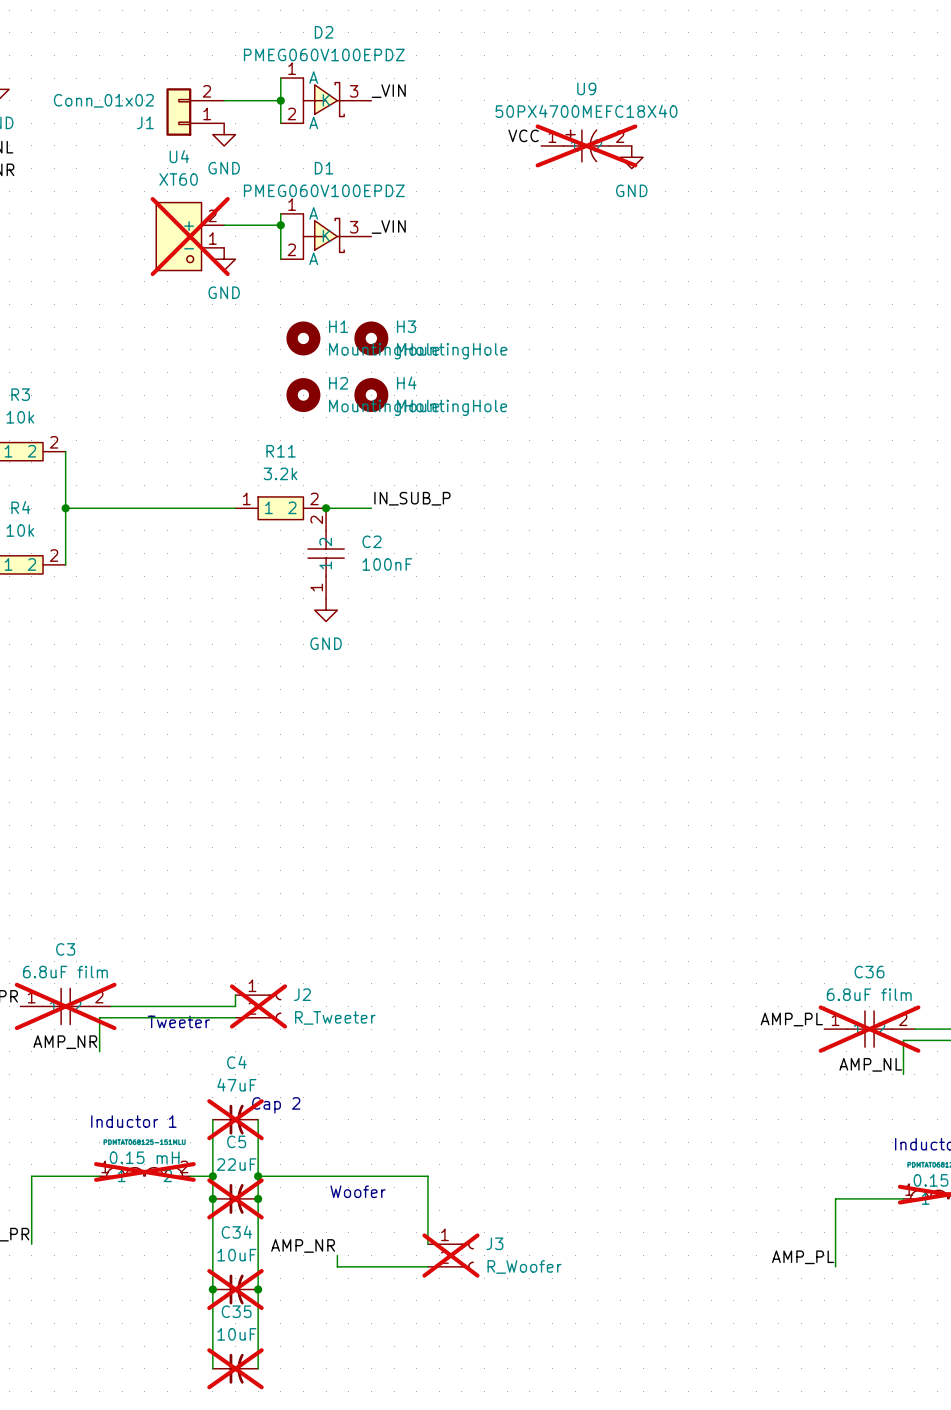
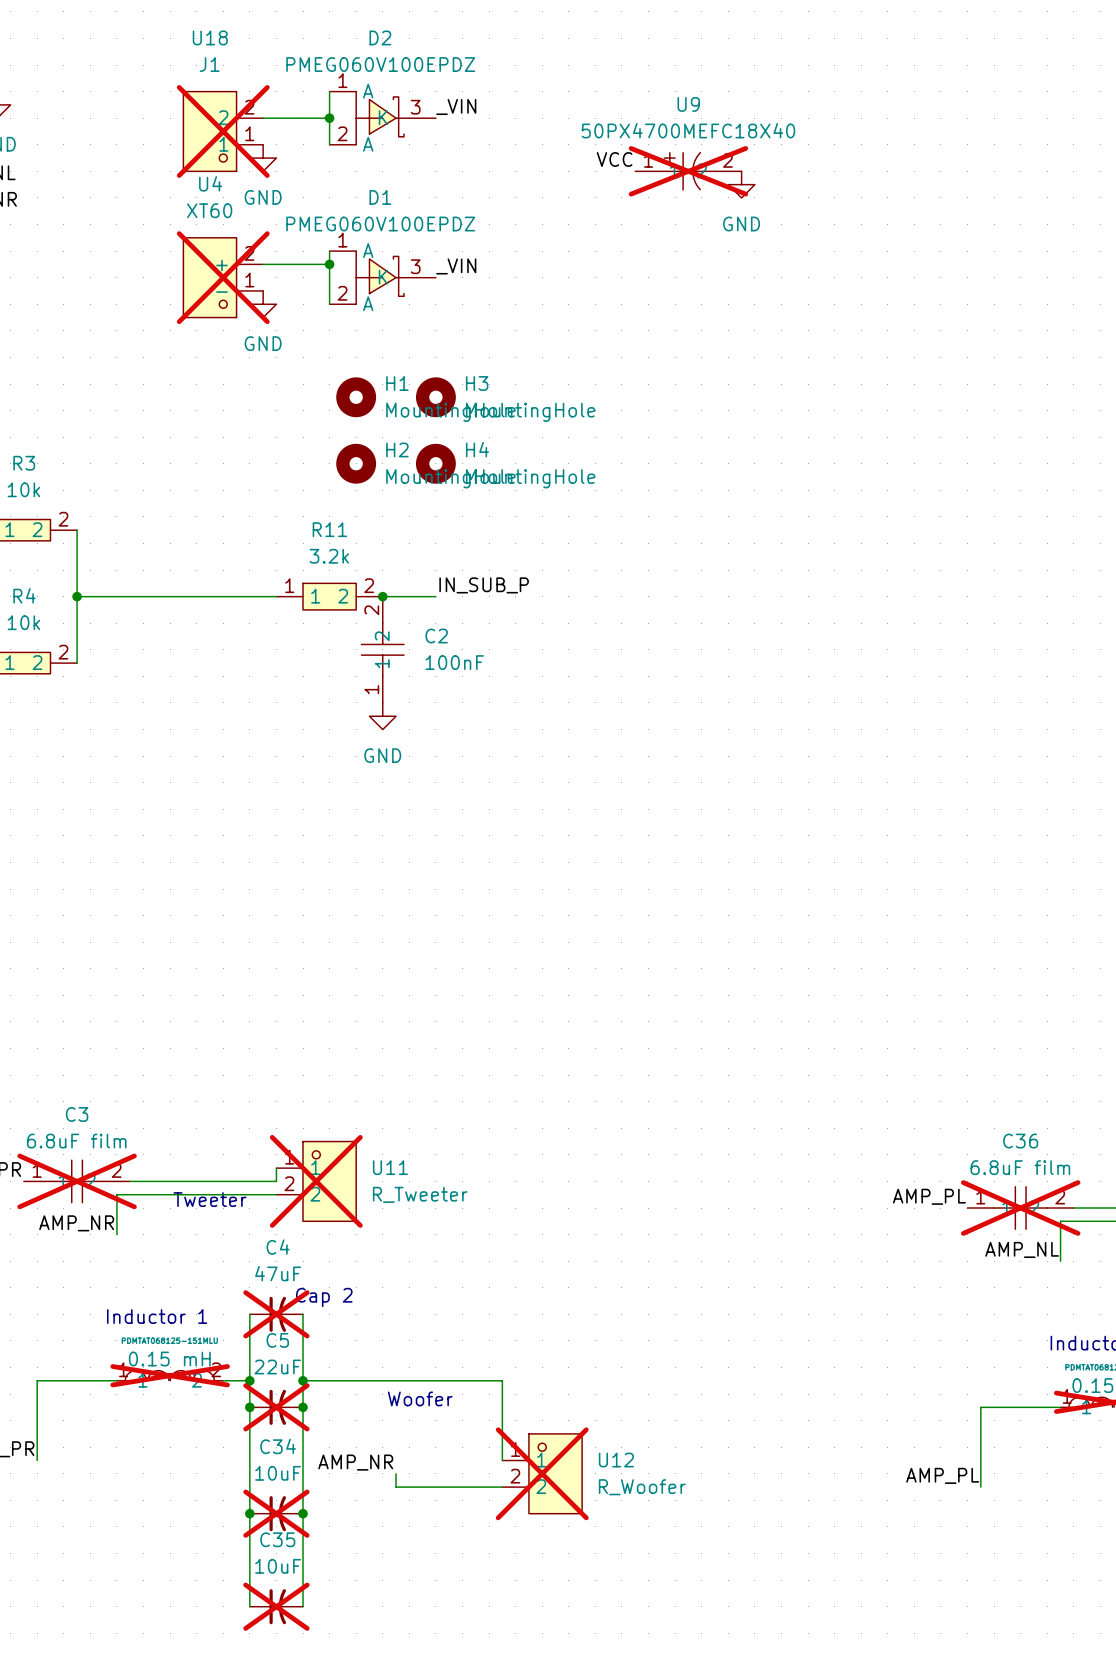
U18: none -> J1 (223, 131)
J1: Conn_01x02 (195, 112) -> none
J2: R_Tweeter (258, 1006) -> none
U11: none -> R_Tweeter (316, 1181)
J3: R_Woofer (450, 1255) -> none
U12: none -> R_Woofer (542, 1473)

